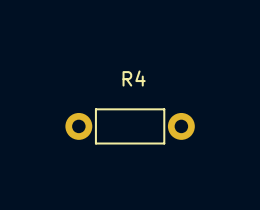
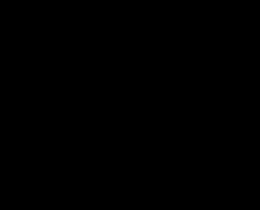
R4: (130, 126) -> none

